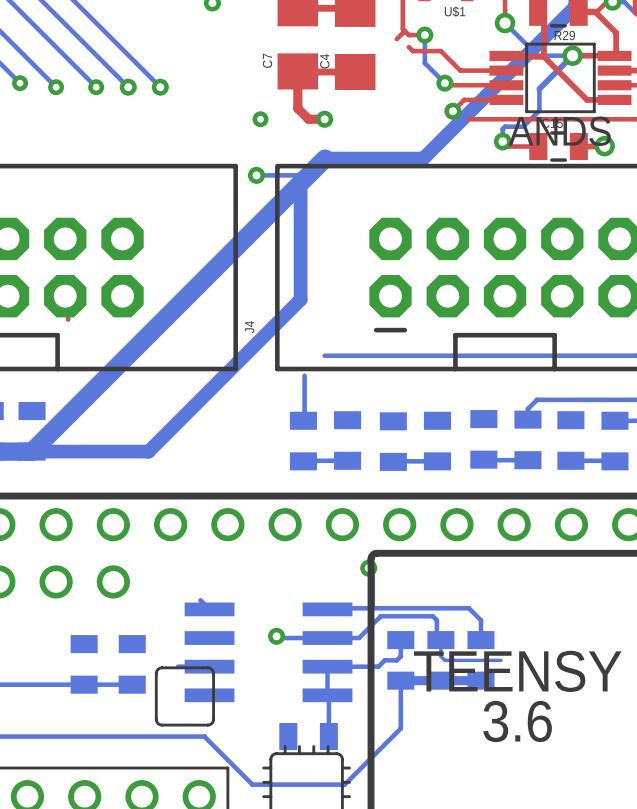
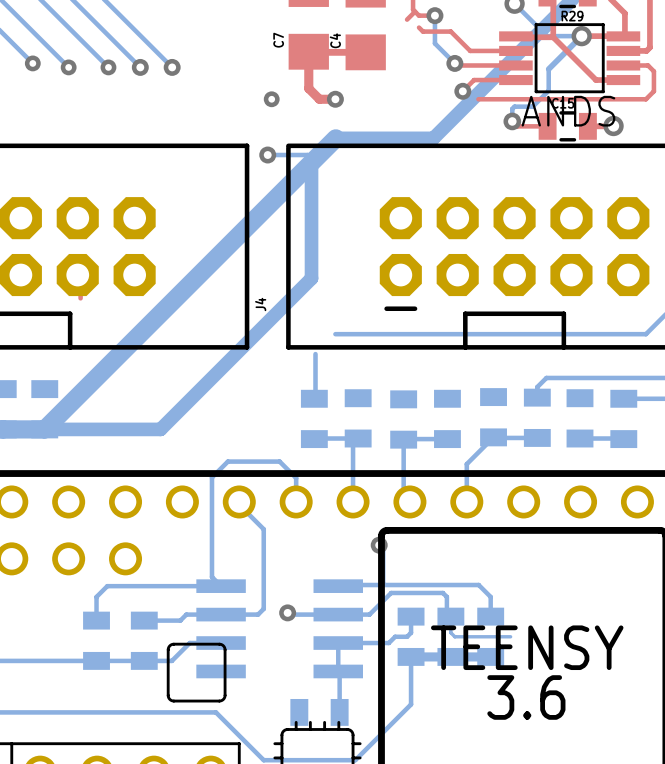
bottom track: none -> (493, 437) (466, 464) (466, 501)
bottom track: none -> (403, 439) (403, 495) (409, 501)
bottom track: none -> (353, 443) (353, 501)
bottom track: none -> (239, 501) (239, 504) (263, 529) (263, 608) (258, 614) (186, 614) (180, 620) (144, 620)
bottom track: none -> (296, 501) (296, 478) (279, 461) (227, 461) (211, 477) (211, 577)
bottom track: none -> (221, 586) (107, 586) (96, 596) (96, 620)
bottom track: none -> (189, 643) (171, 660) (144, 660)

